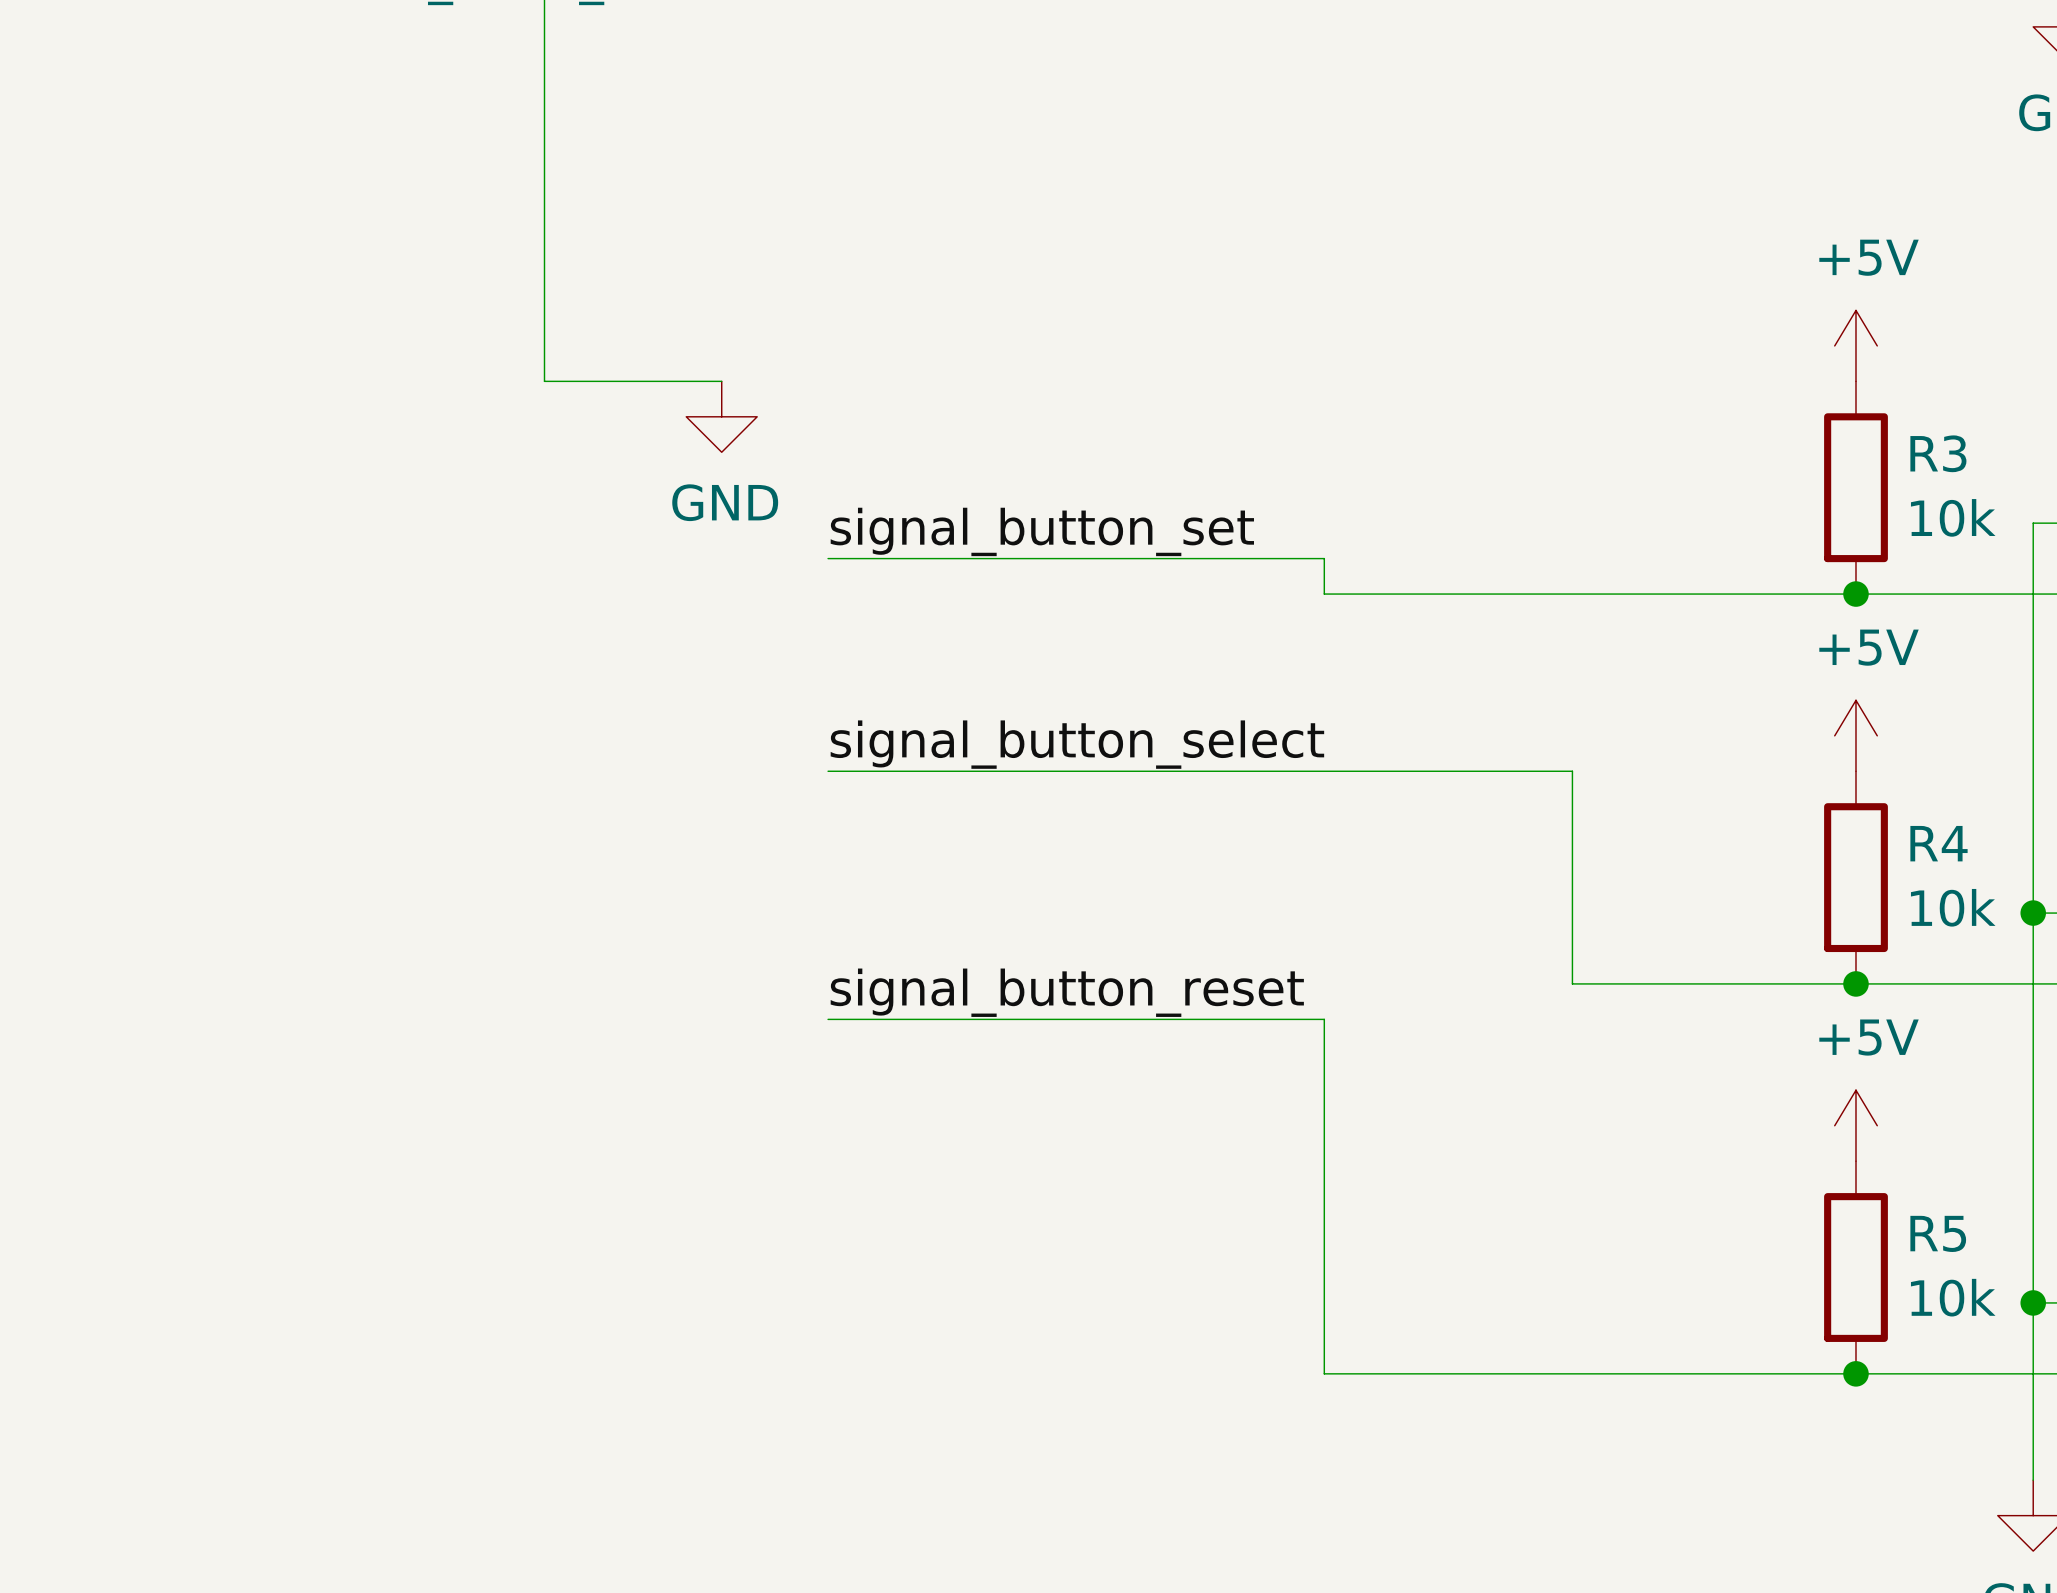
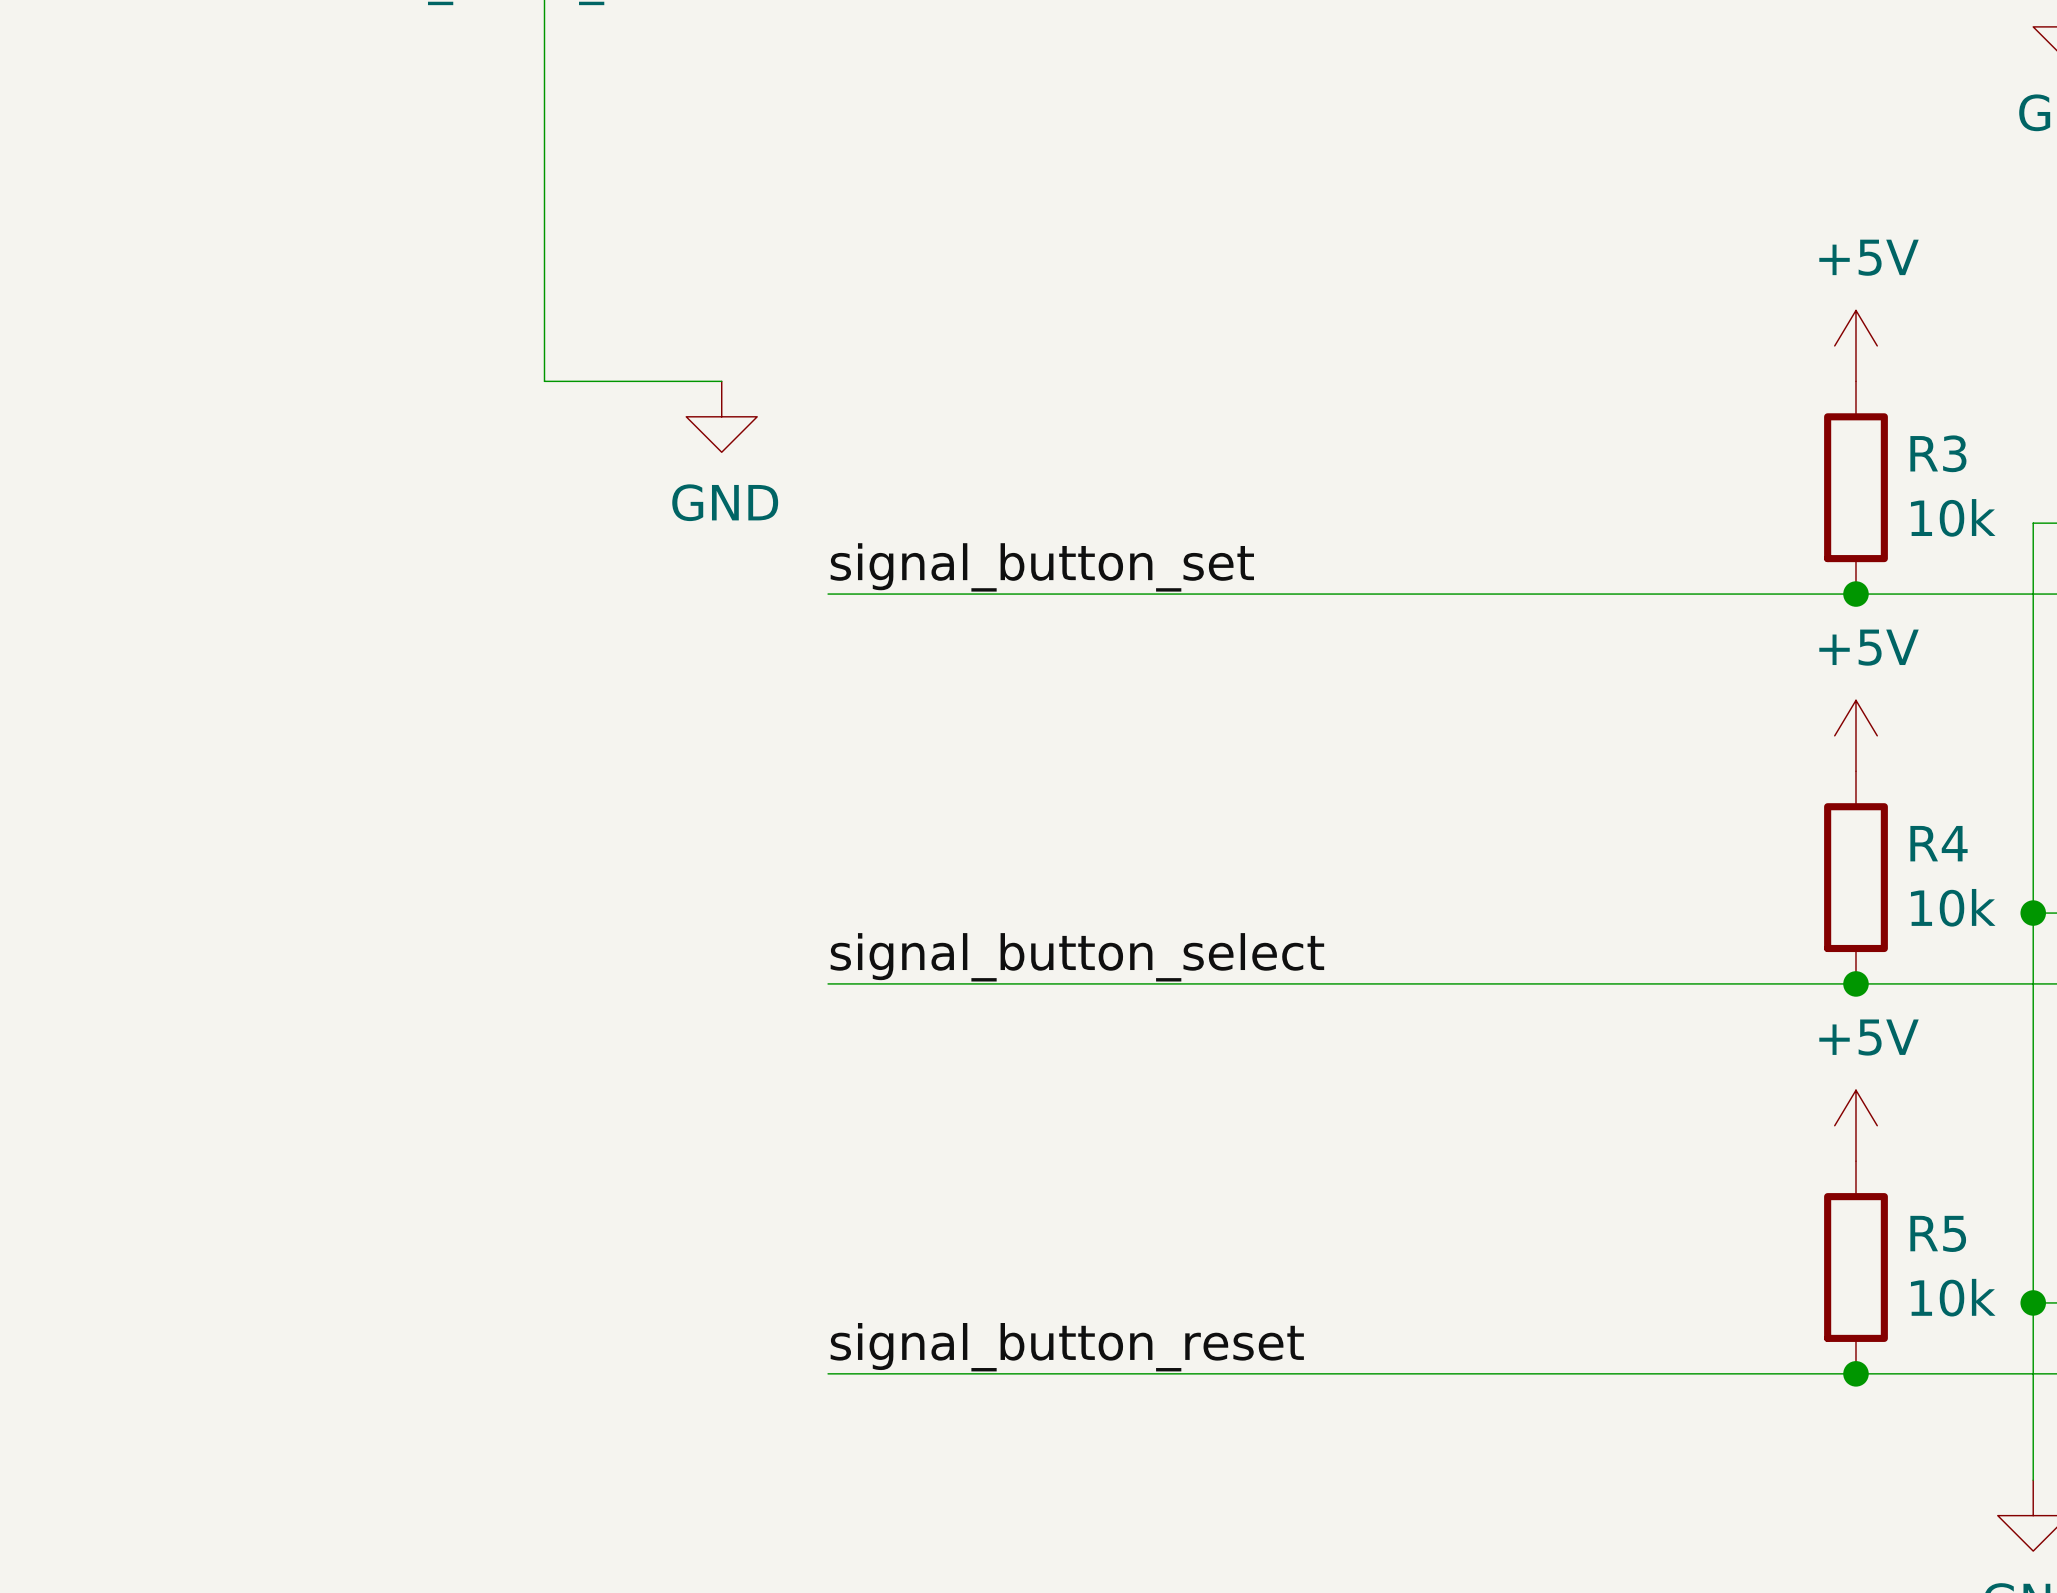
label position: signal_button_set (1042, 531) -> signal_button_set (1042, 567)
wire: (828, 558) (1324, 558) (1324, 594) -> (828, 594) (1324, 594)
label position: signal_button_select (1077, 744) -> signal_button_select (1077, 957)
wire: (828, 771) (1572, 771) (1572, 983) -> (828, 983) (1572, 983)
label position: signal_button_reset (1067, 992) -> signal_button_reset (1067, 1347)
wire: (828, 1019) (1324, 1019) (1324, 1373) -> (828, 1373) (1324, 1373)

